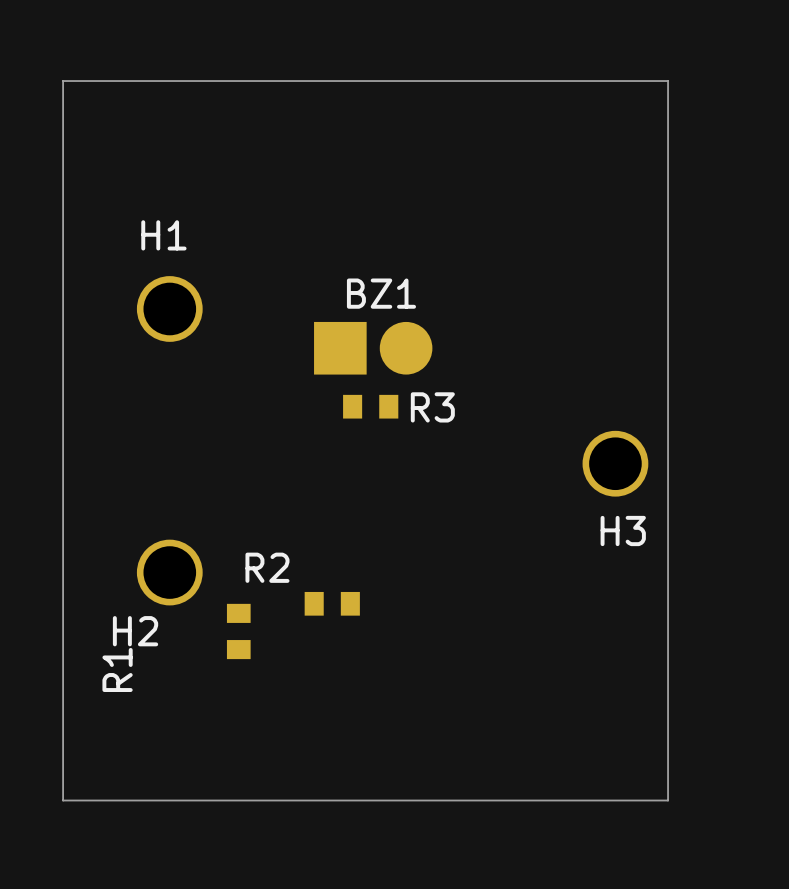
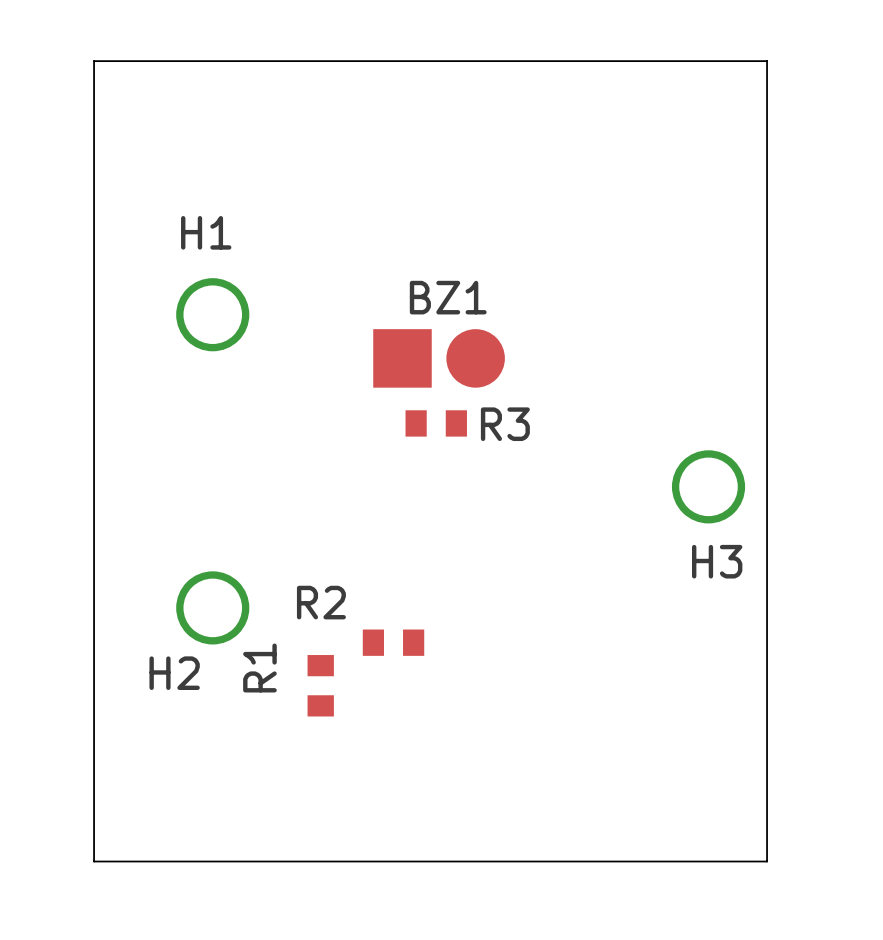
R1 position: (238, 631) -> (320, 685)
R1 name position: R1 (117, 669) -> R1 (259, 668)

